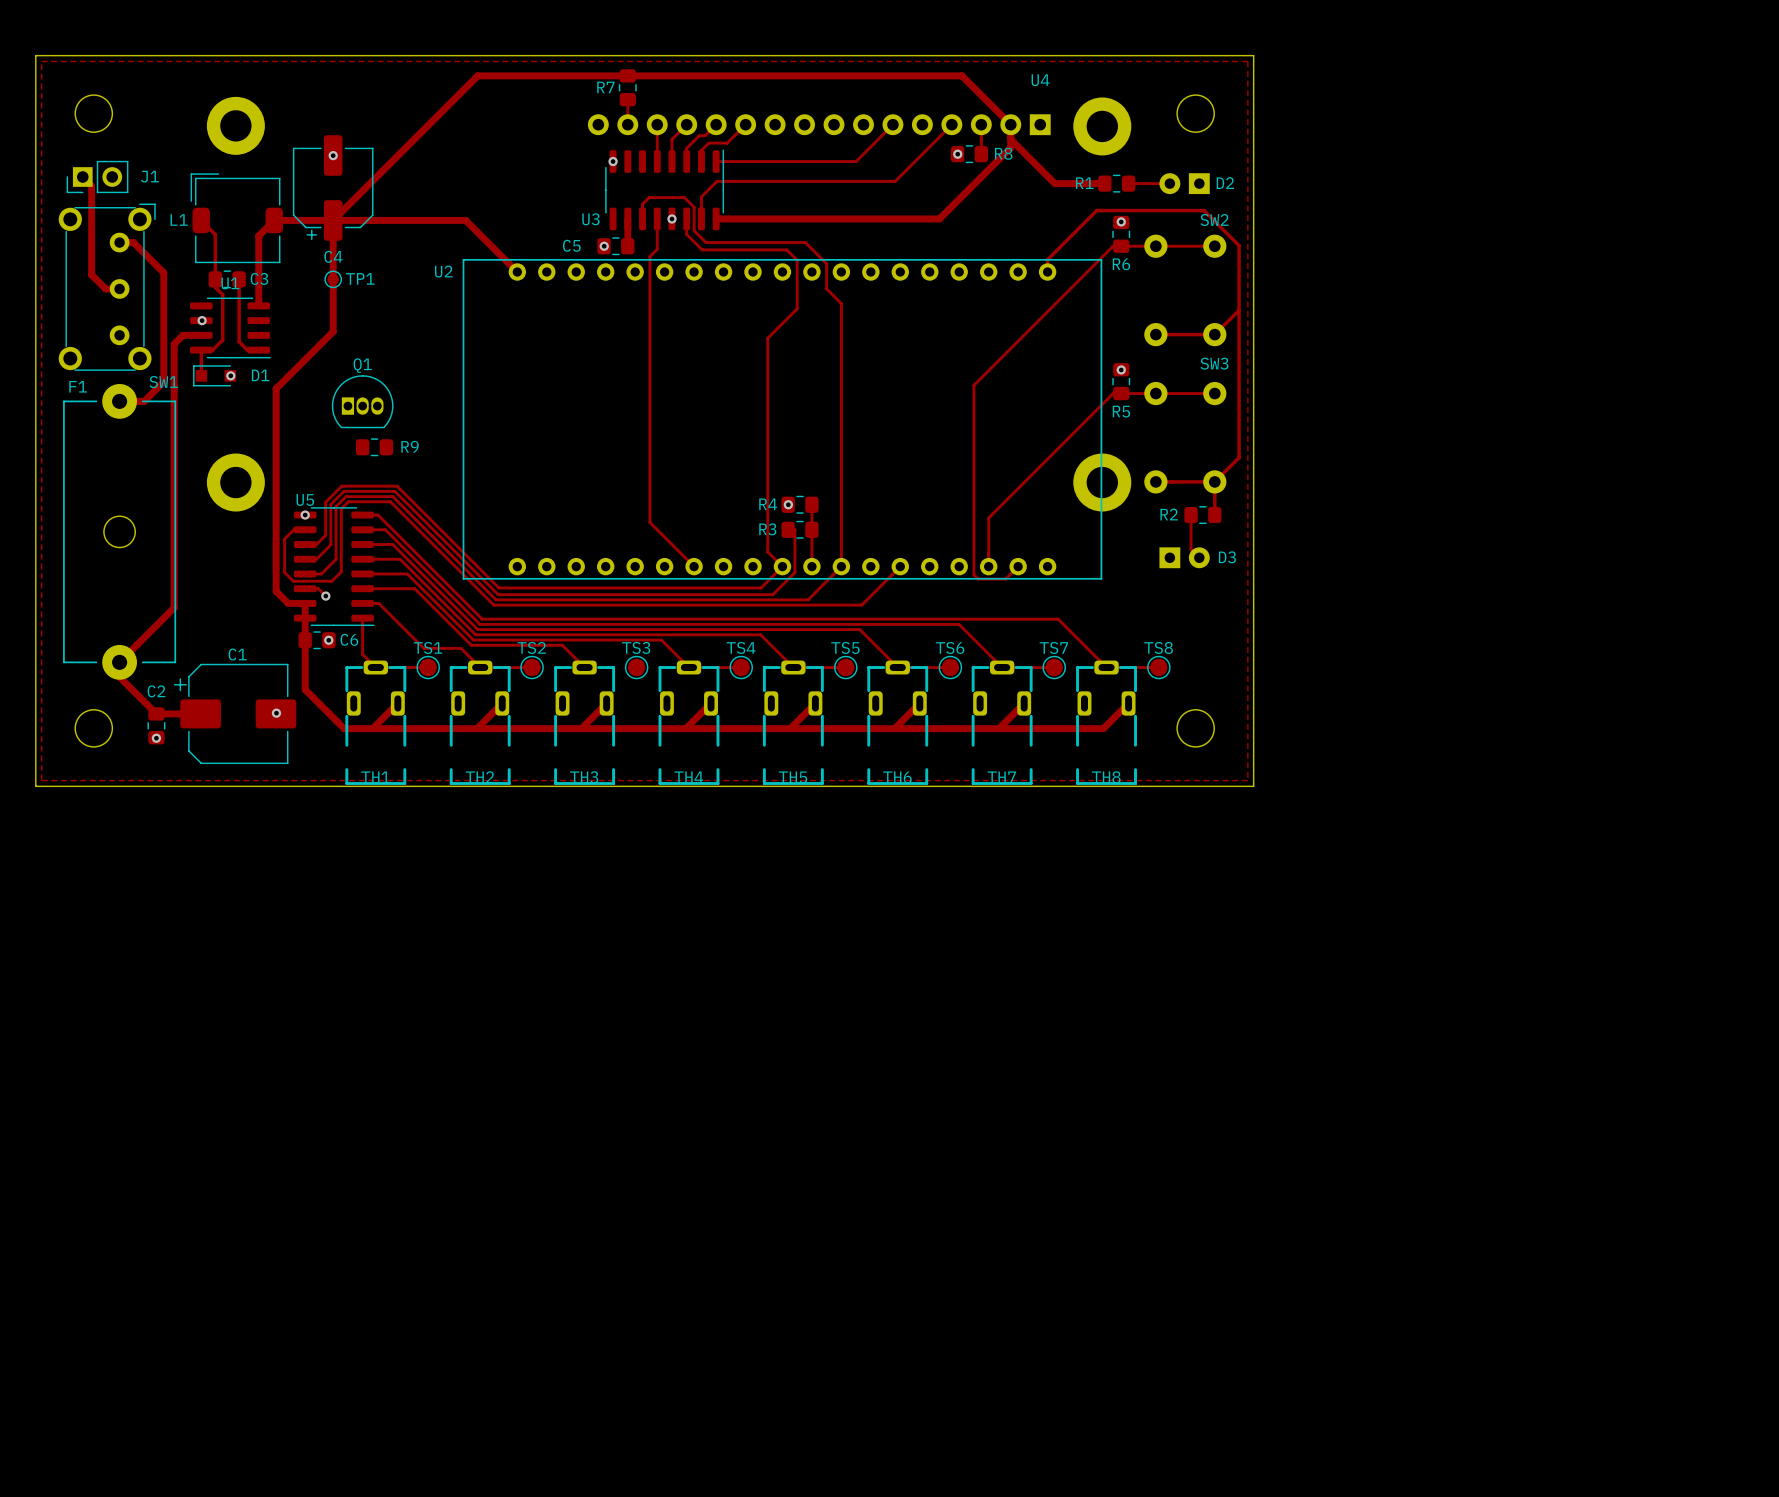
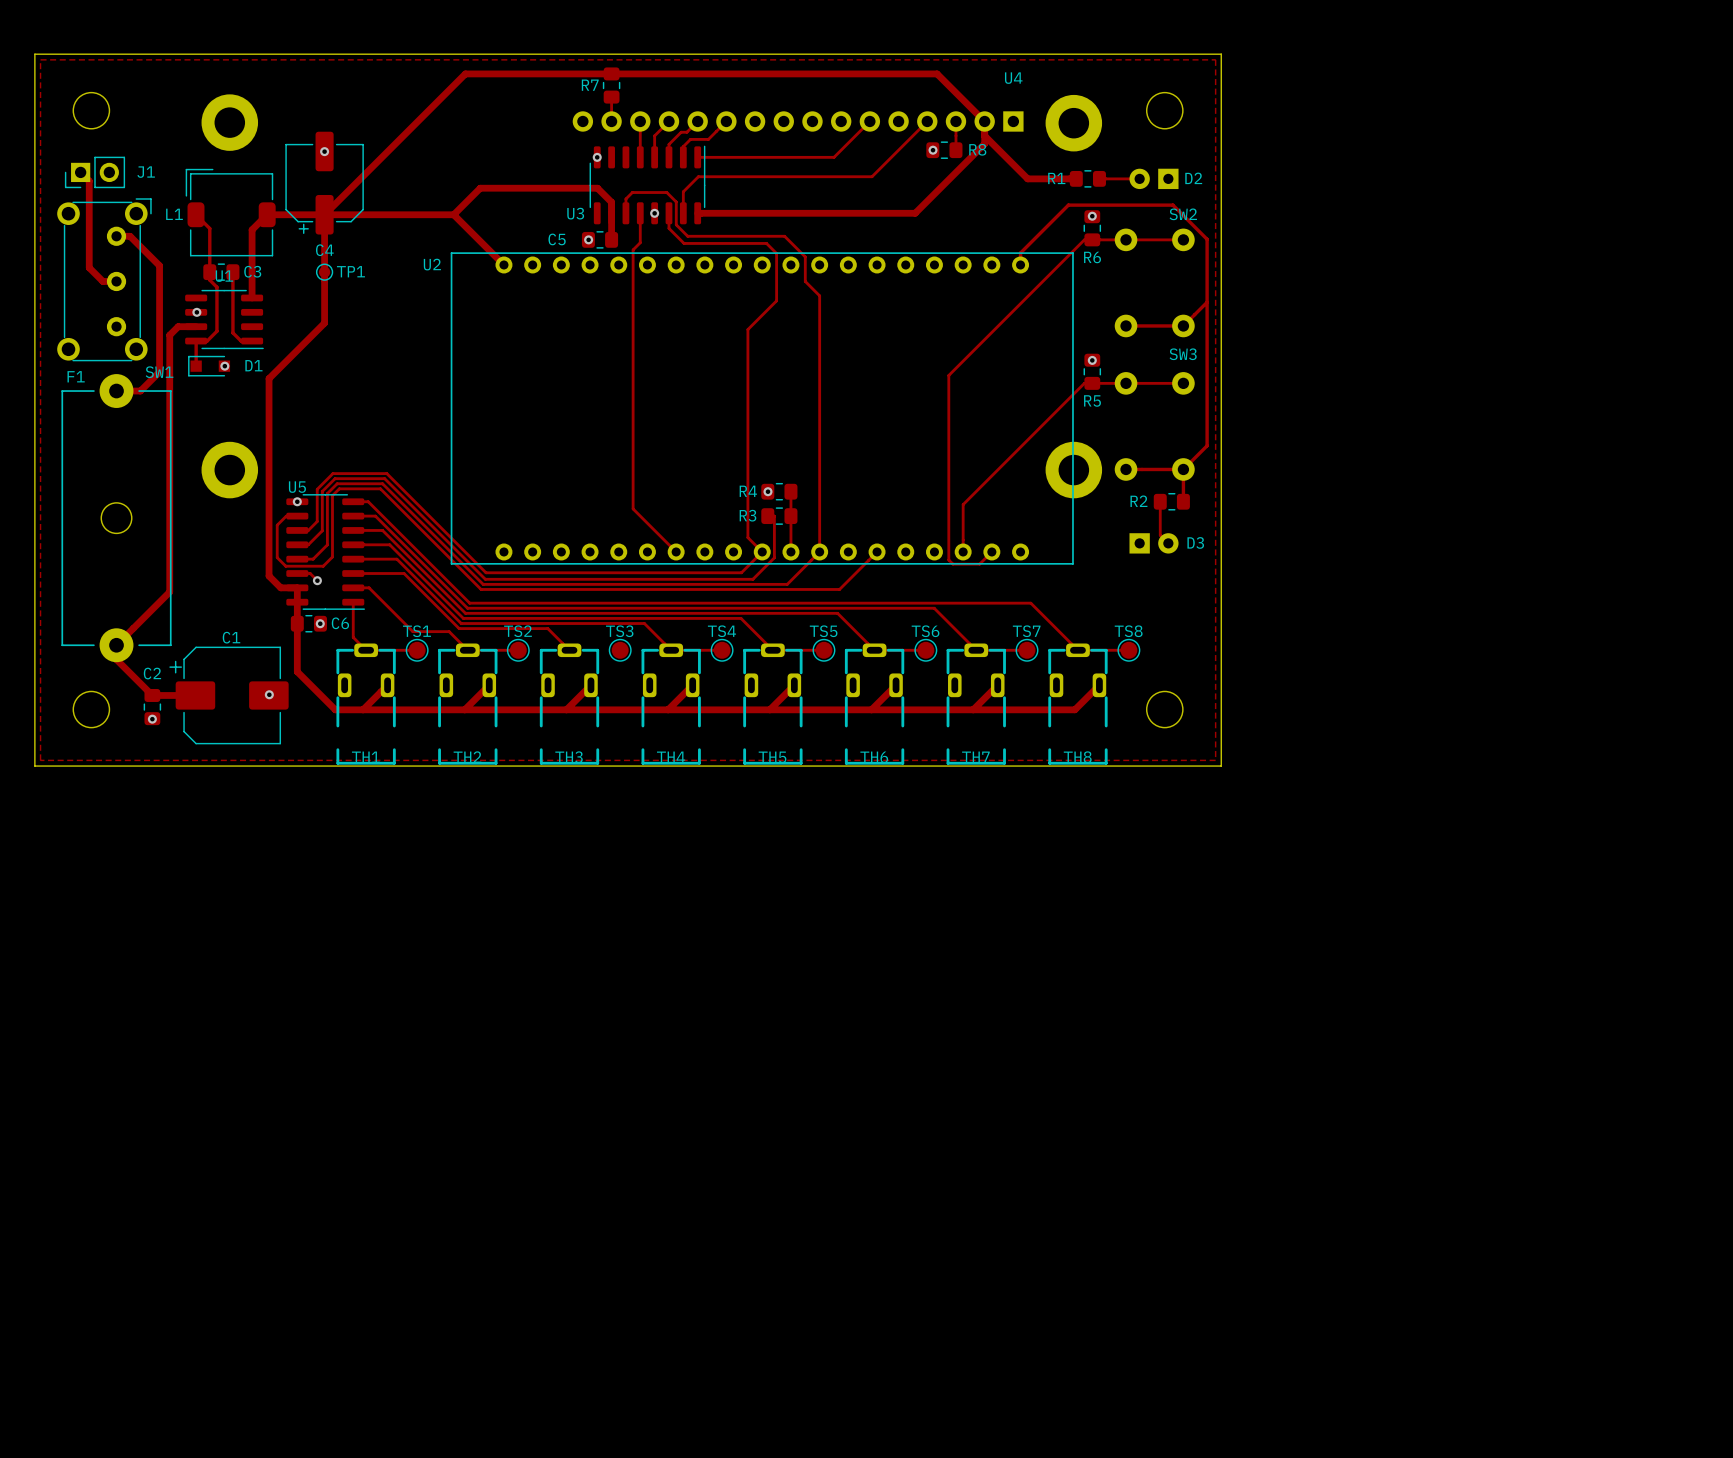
track: none -> (611, 213) (611, 202) (597, 188) (480, 188) (453, 214)
Q1: (362, 401) -> none
R9: (374, 447) -> none

